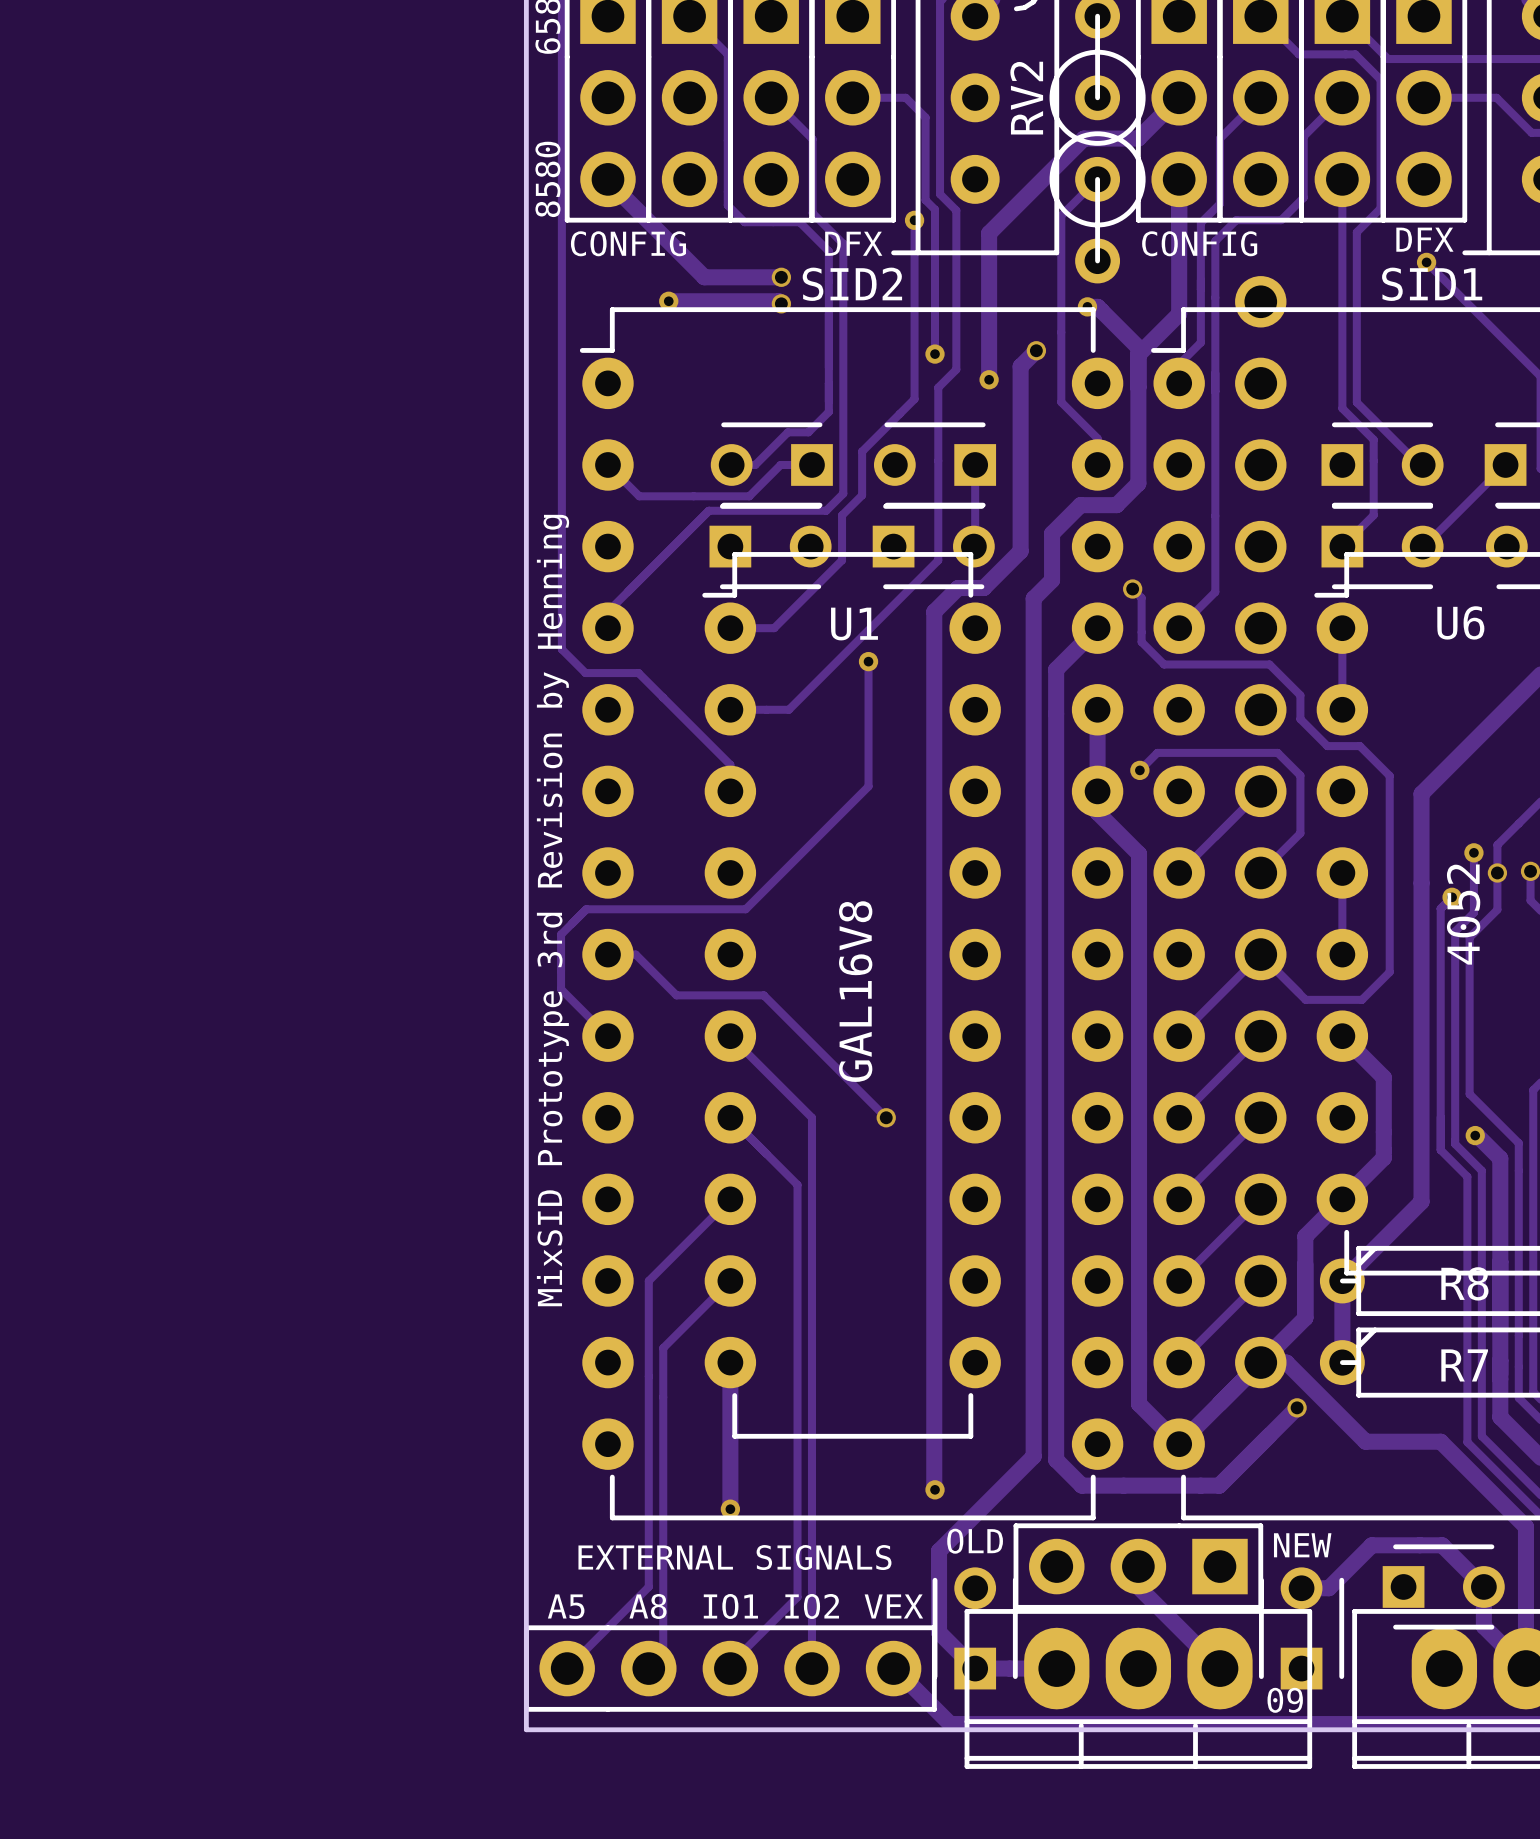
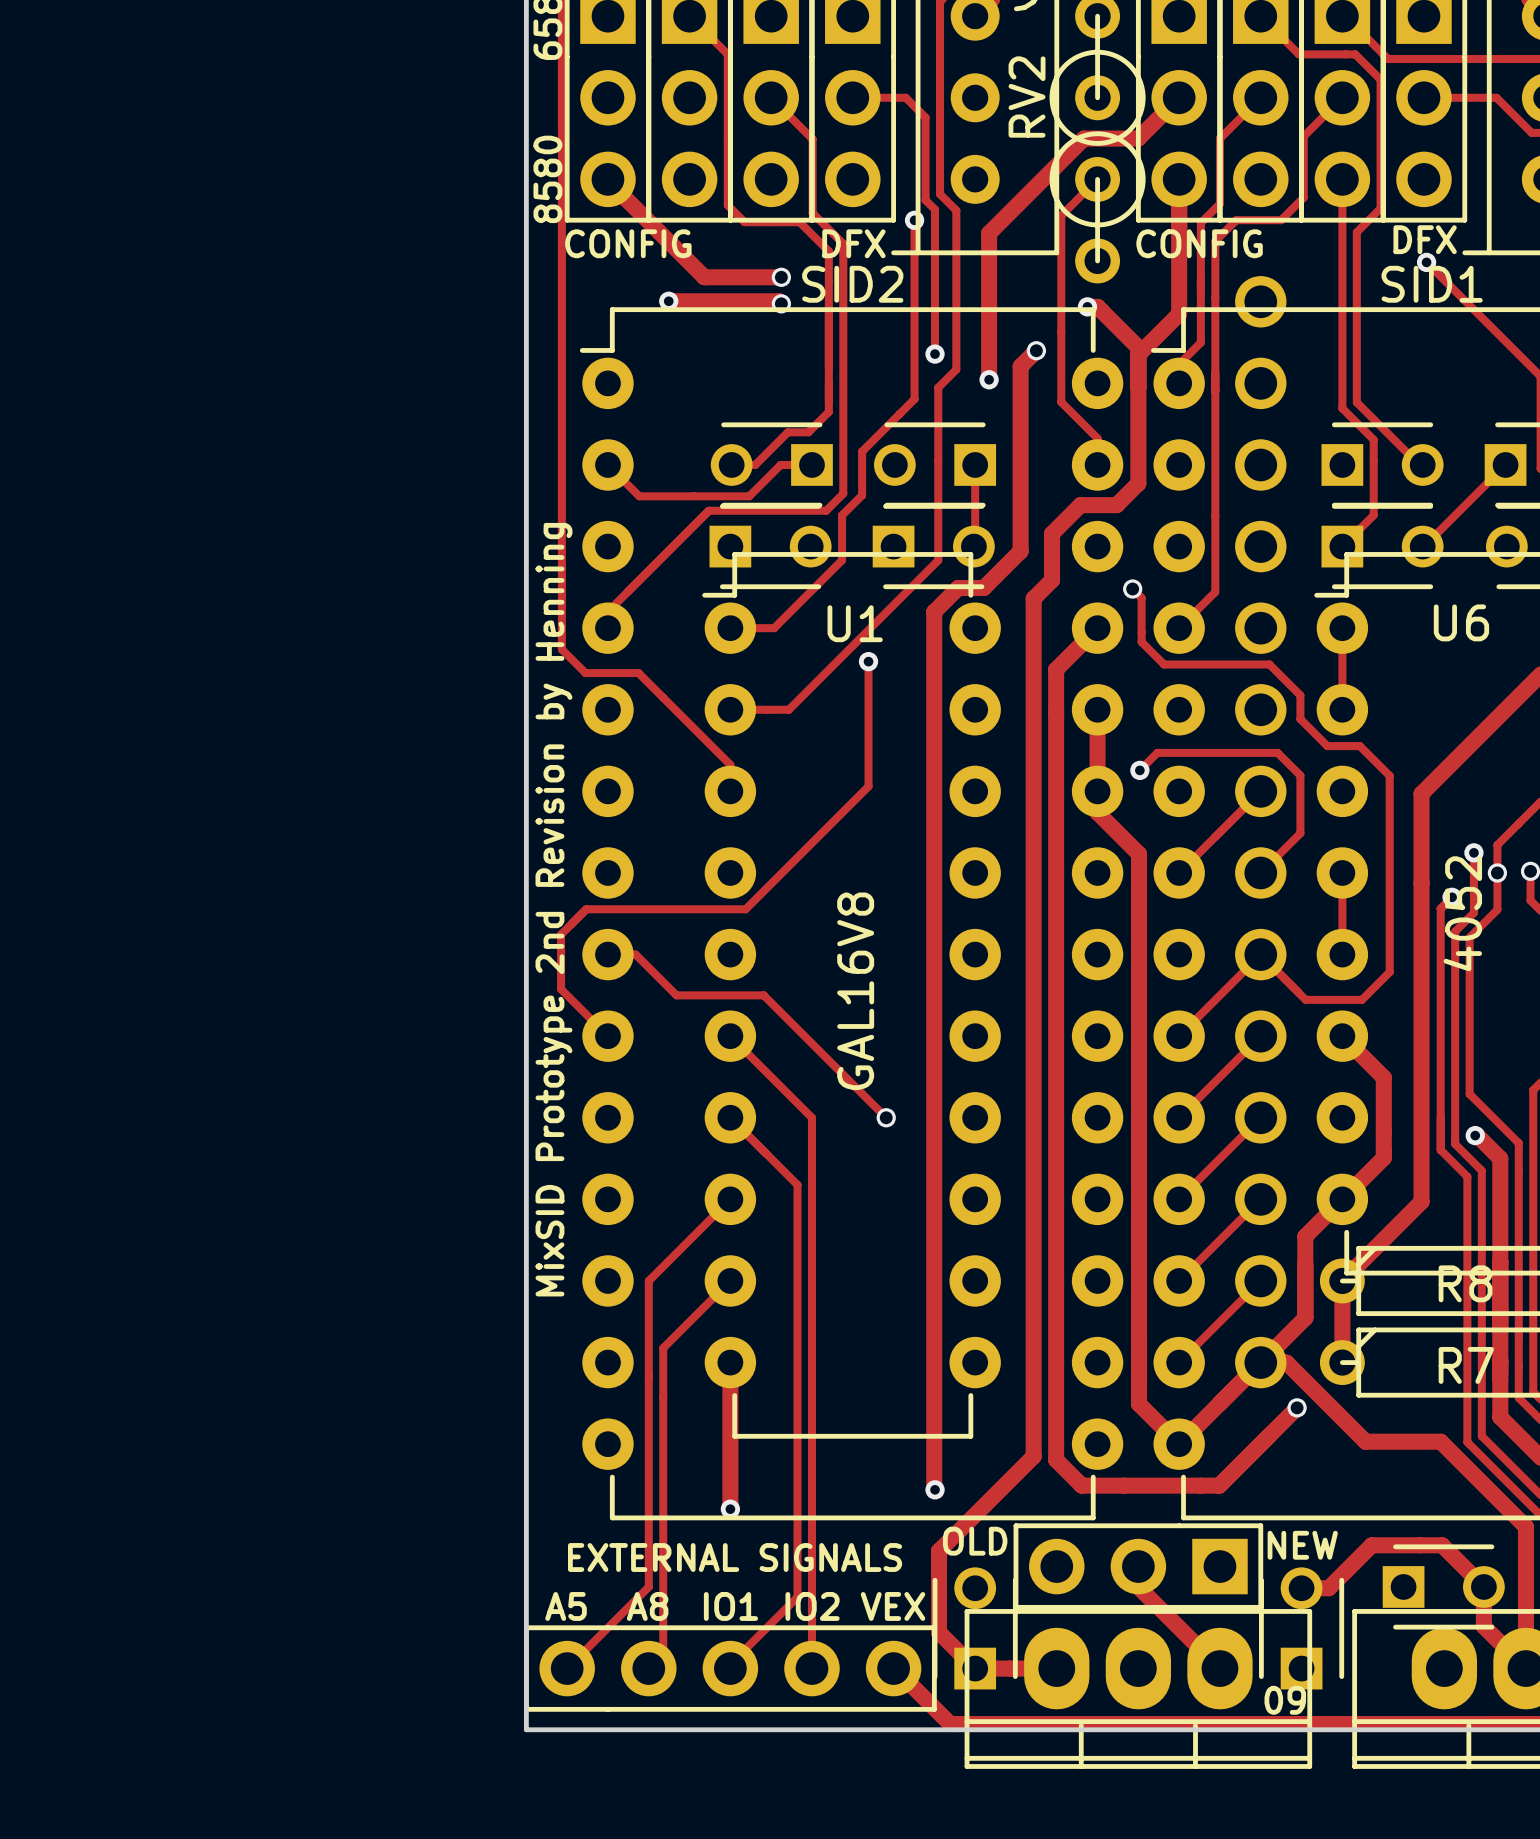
text: MixSID Prototype 3rd Revision by Henning (553, 910) -> MixSID Prototype 2nd Revision by Henning (553, 909)

